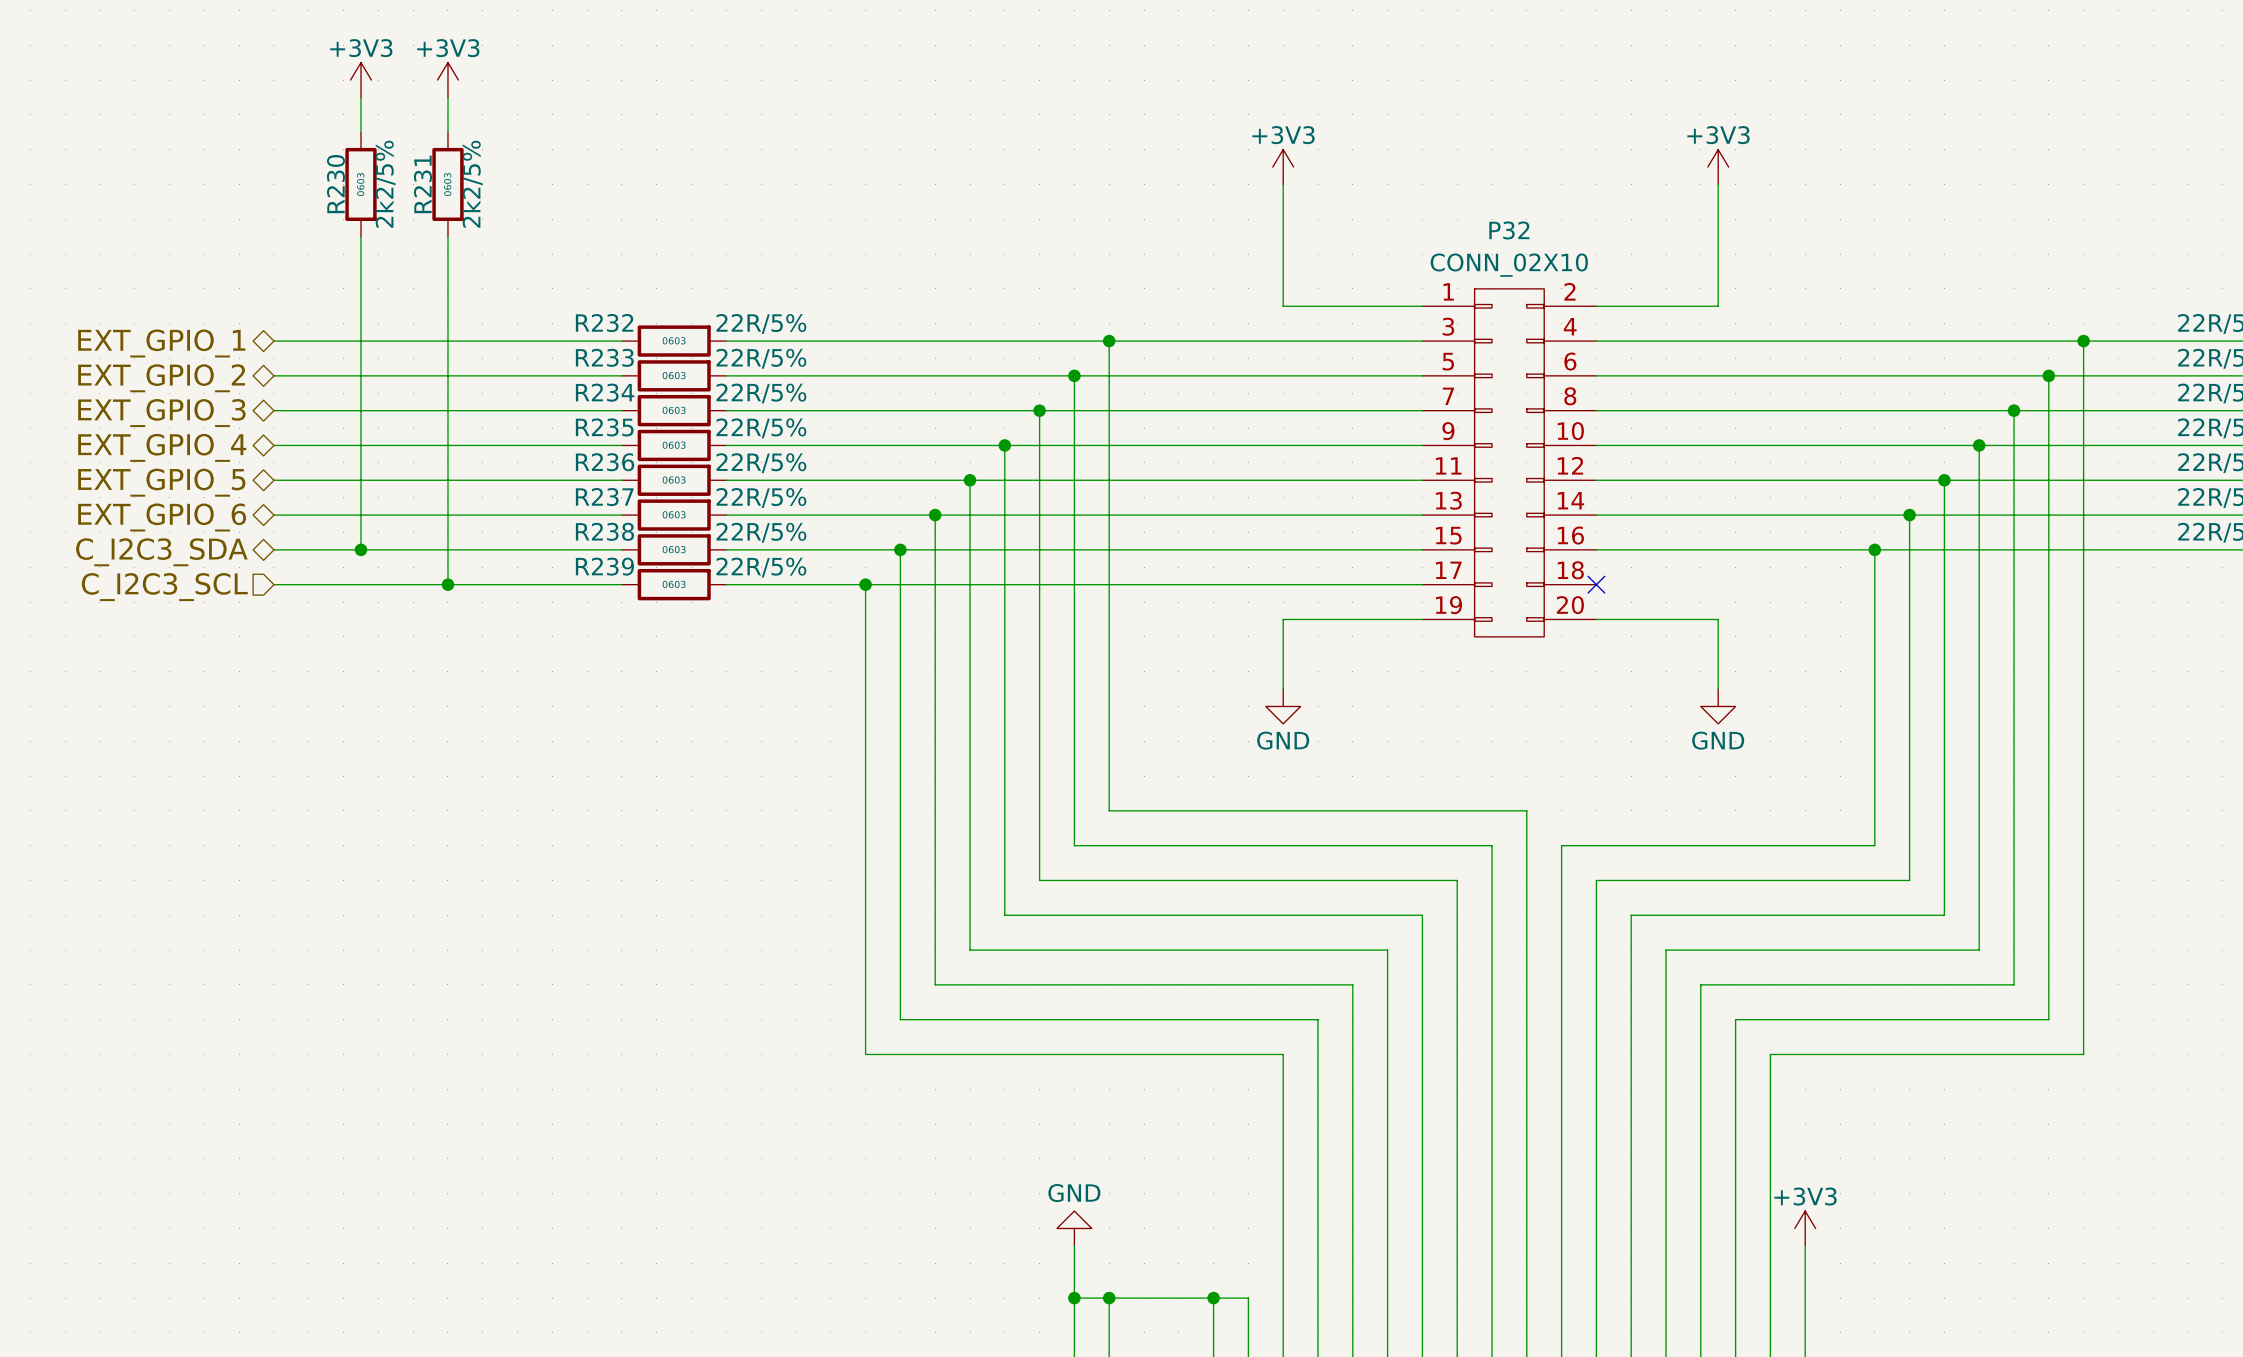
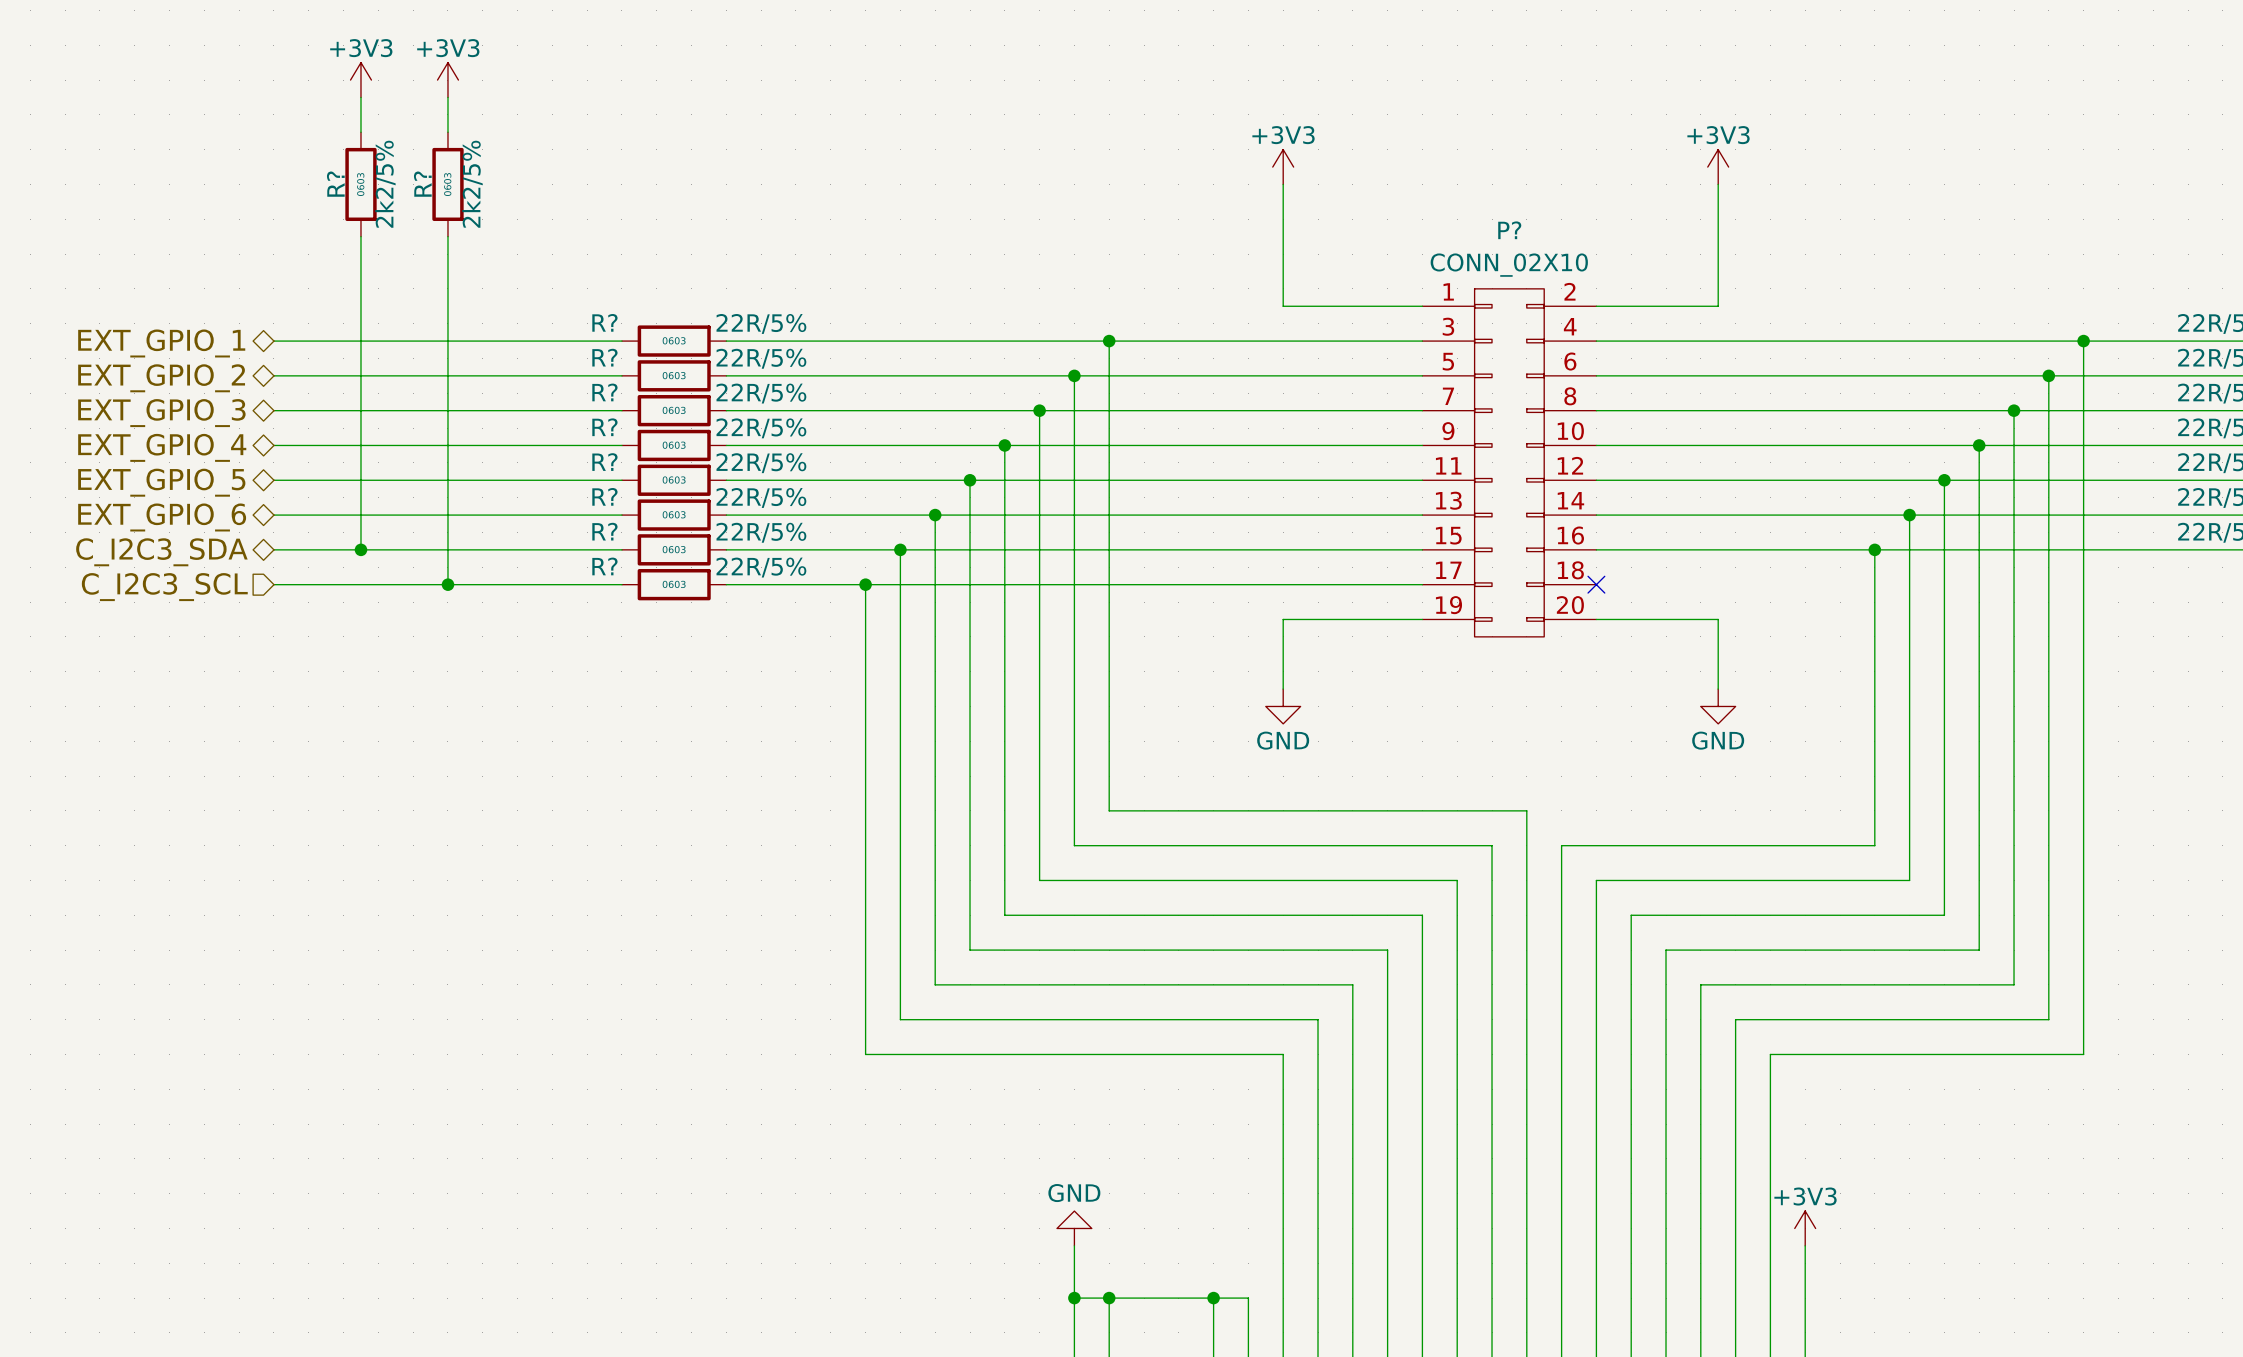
R230 name: R230 (335, 184) -> R? (335, 184)
R231 name: R231 (422, 184) -> R? (422, 184)
P32 name: P32 (1509, 230) -> P? (1509, 230)
R232 name: R232 (604, 323) -> R? (604, 322)
R233 name: R233 (604, 357) -> R? (604, 357)
R234 name: R234 (605, 392) -> R? (604, 392)
R235 name: R235 (604, 427) -> R? (604, 427)
R236 name: R236 (605, 462) -> R? (604, 462)
R237 name: R237 (604, 497) -> R? (604, 496)
R238 name: R238 (604, 531) -> R? (604, 531)
R239 name: R239 (604, 566) -> R? (604, 566)

